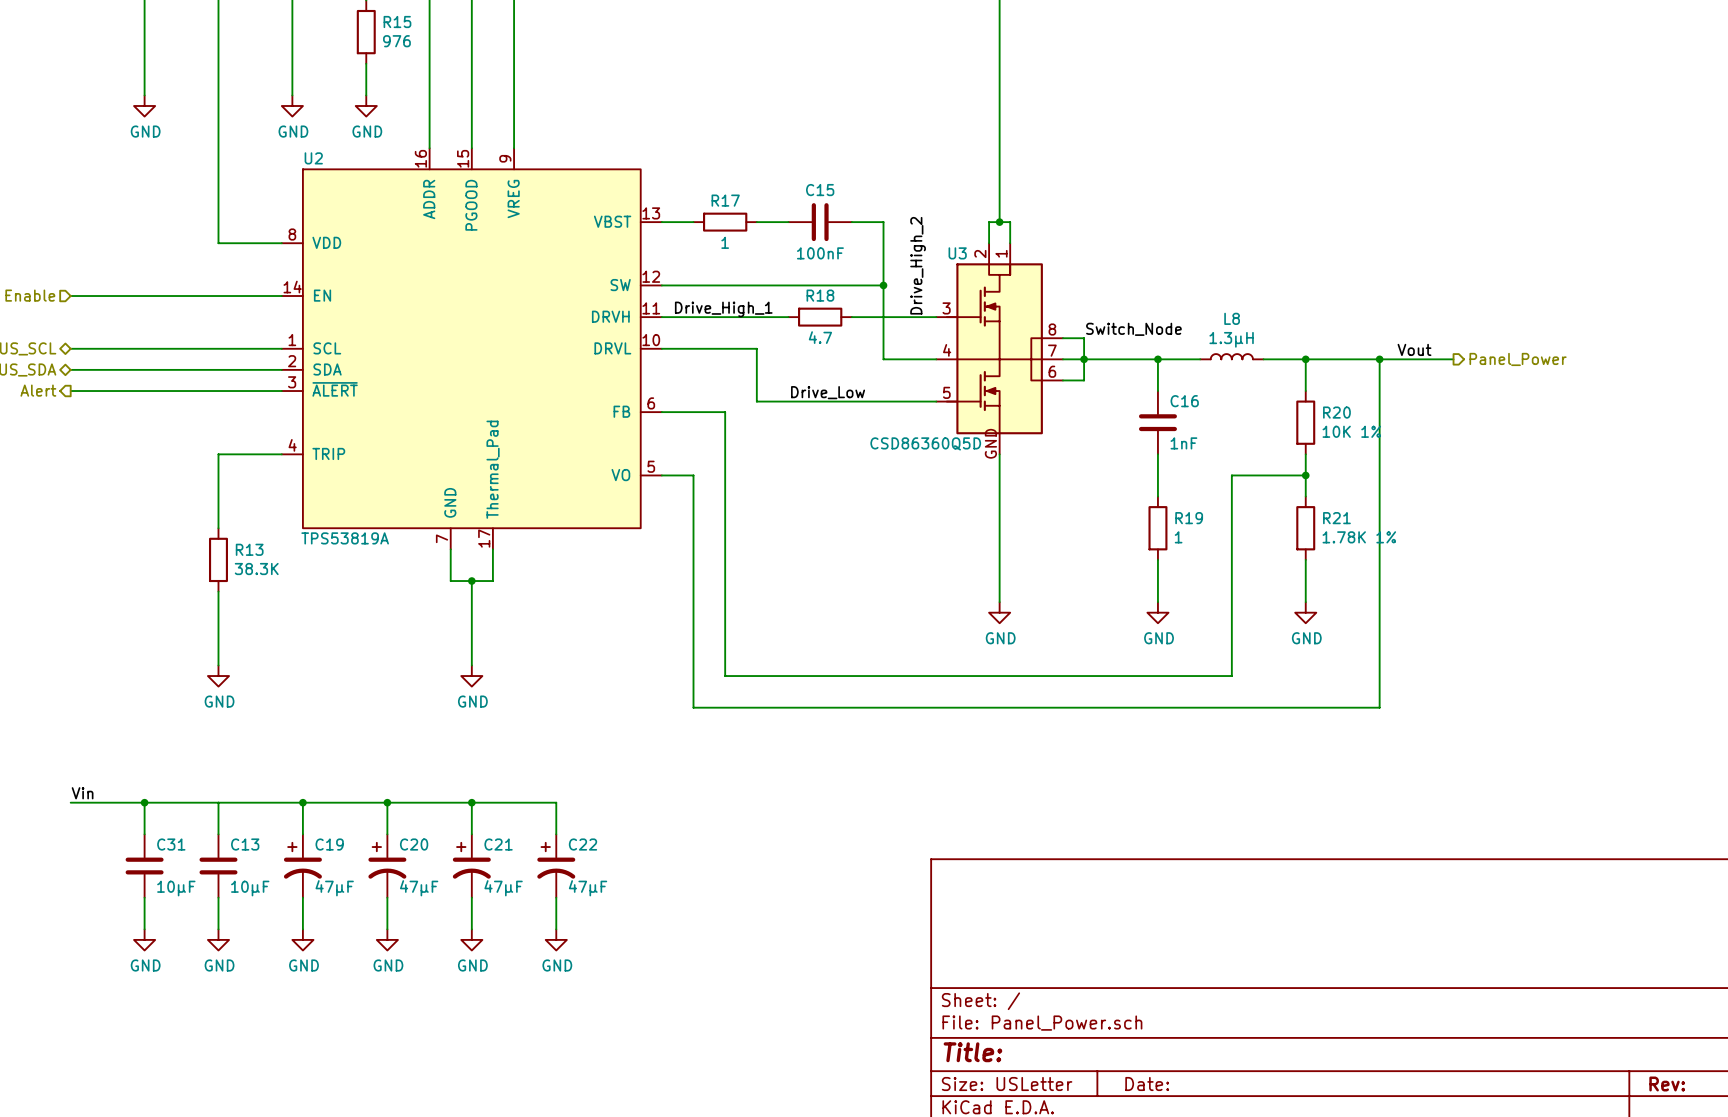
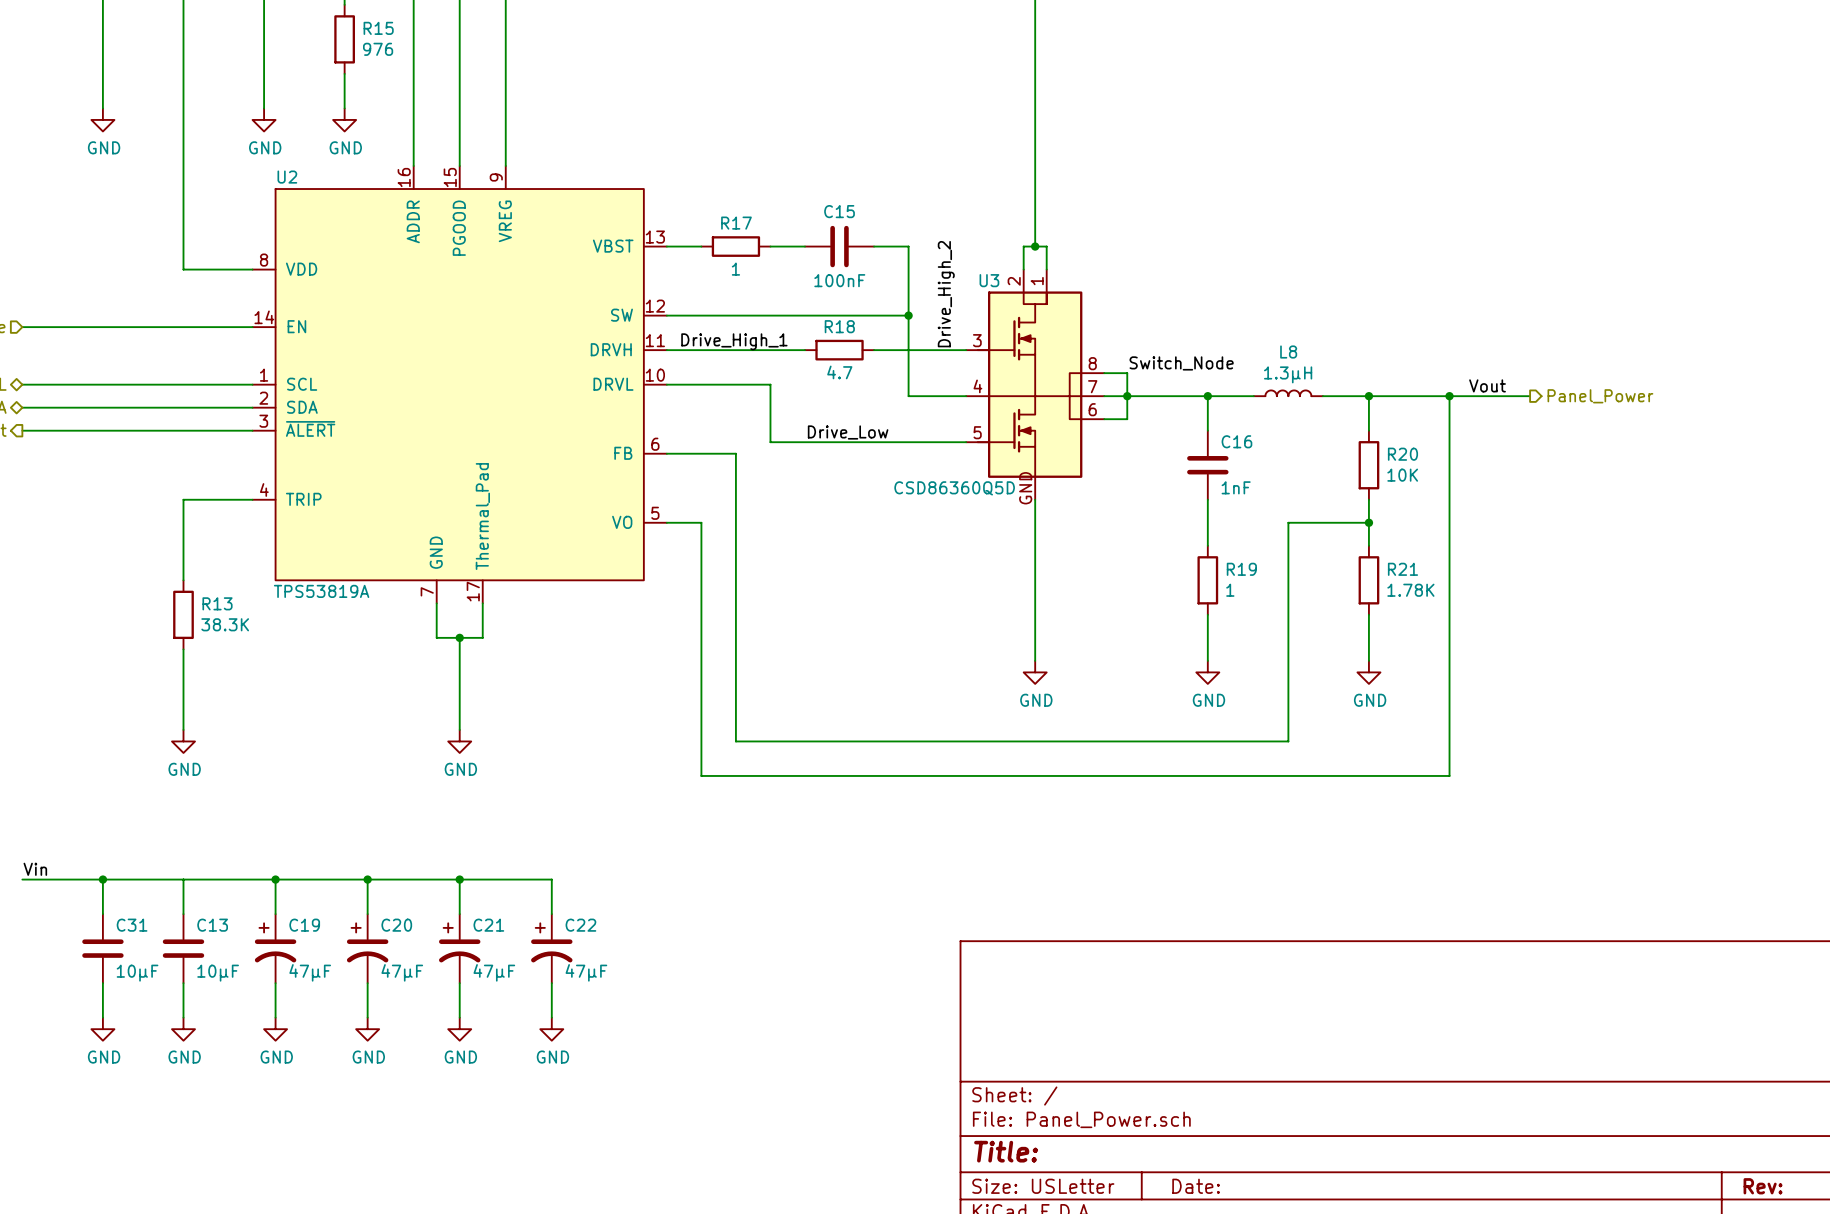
R20 value: 10K 1% (1351, 431) -> 10K (1402, 475)
R21 value: 1.78K 1% (1359, 537) -> 1.78K (1410, 590)

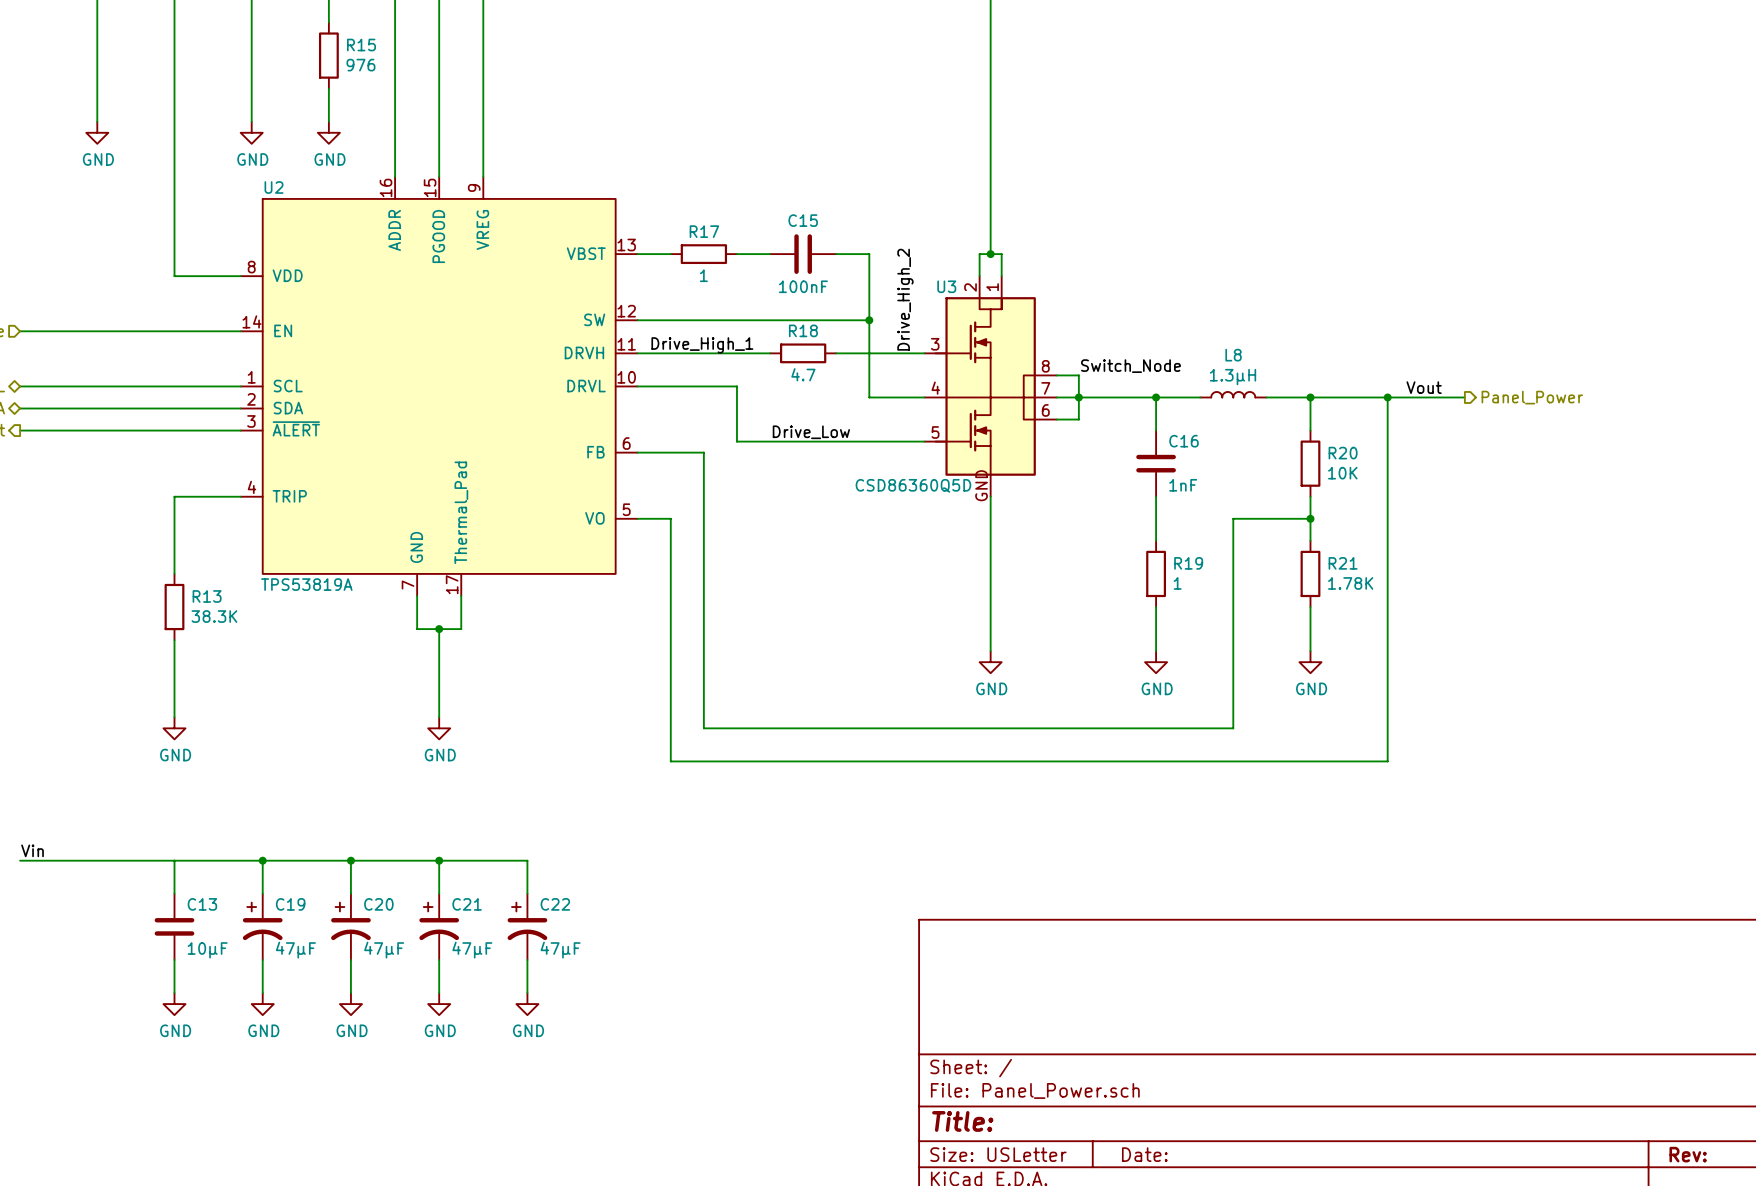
wire: (102, 879) (102, 914) -> none
junction: (102, 879) -> none
C31: 10µF (102, 948) -> none
wire: (102, 983) (102, 1017) -> none
power symbol: GND (102, 1029) -> none

